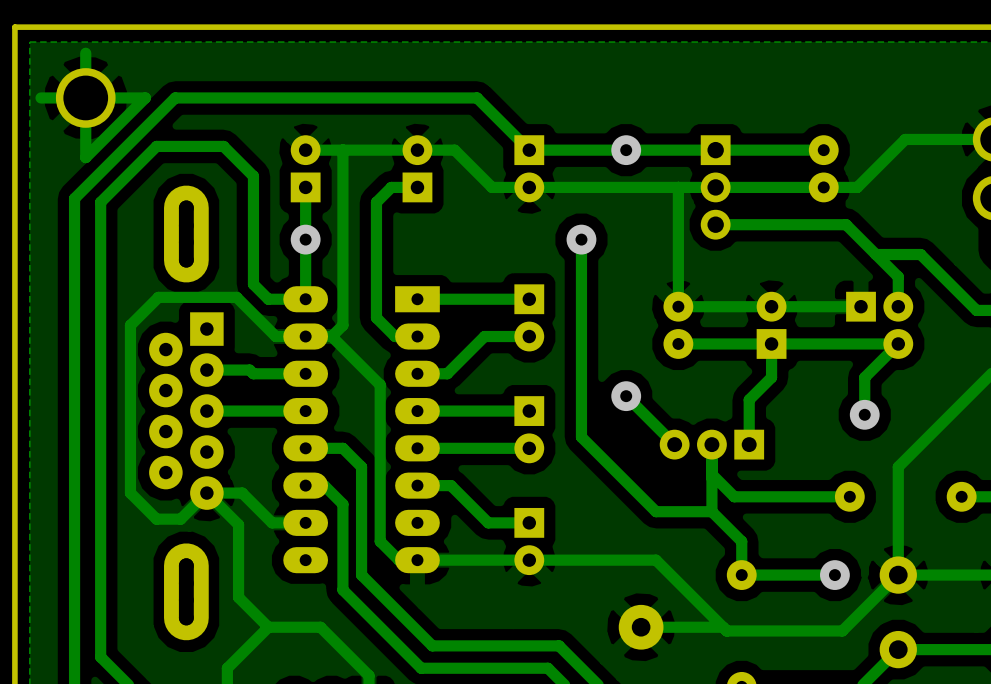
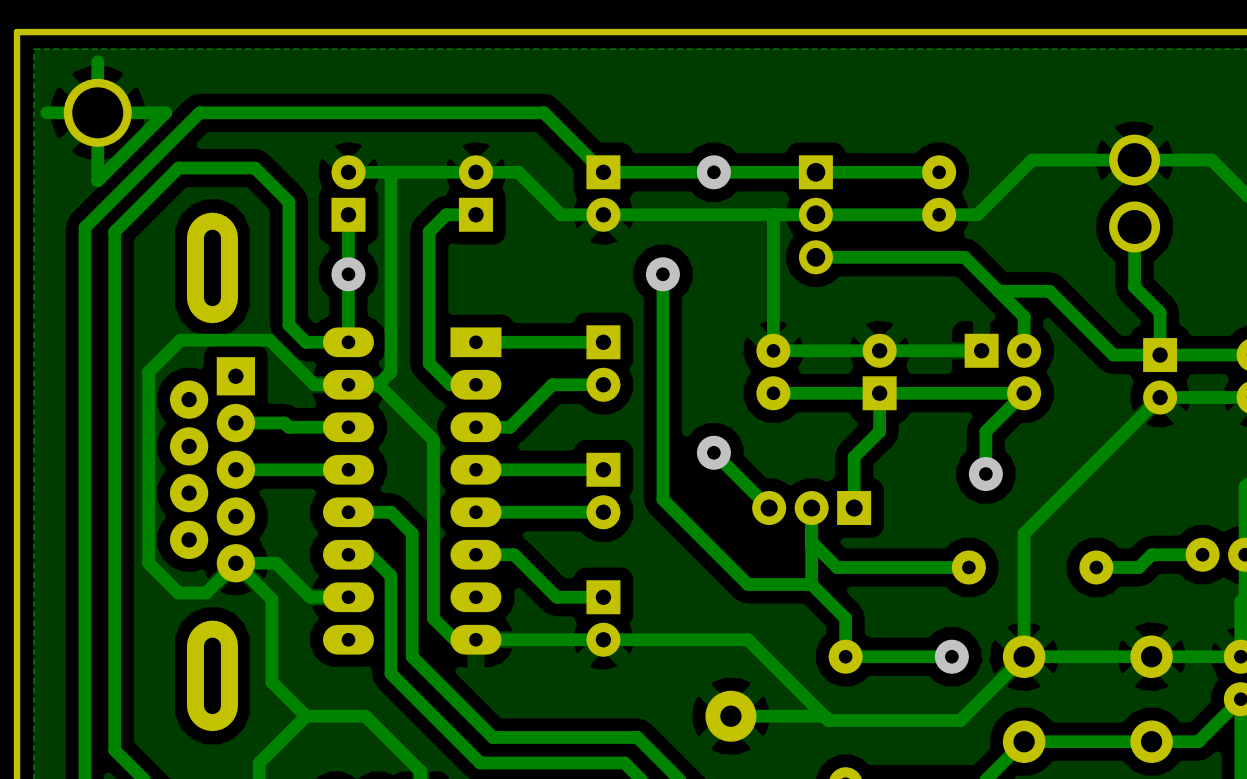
part footprint: [149, 185, 224, 641] -> [169, 212, 255, 732]

